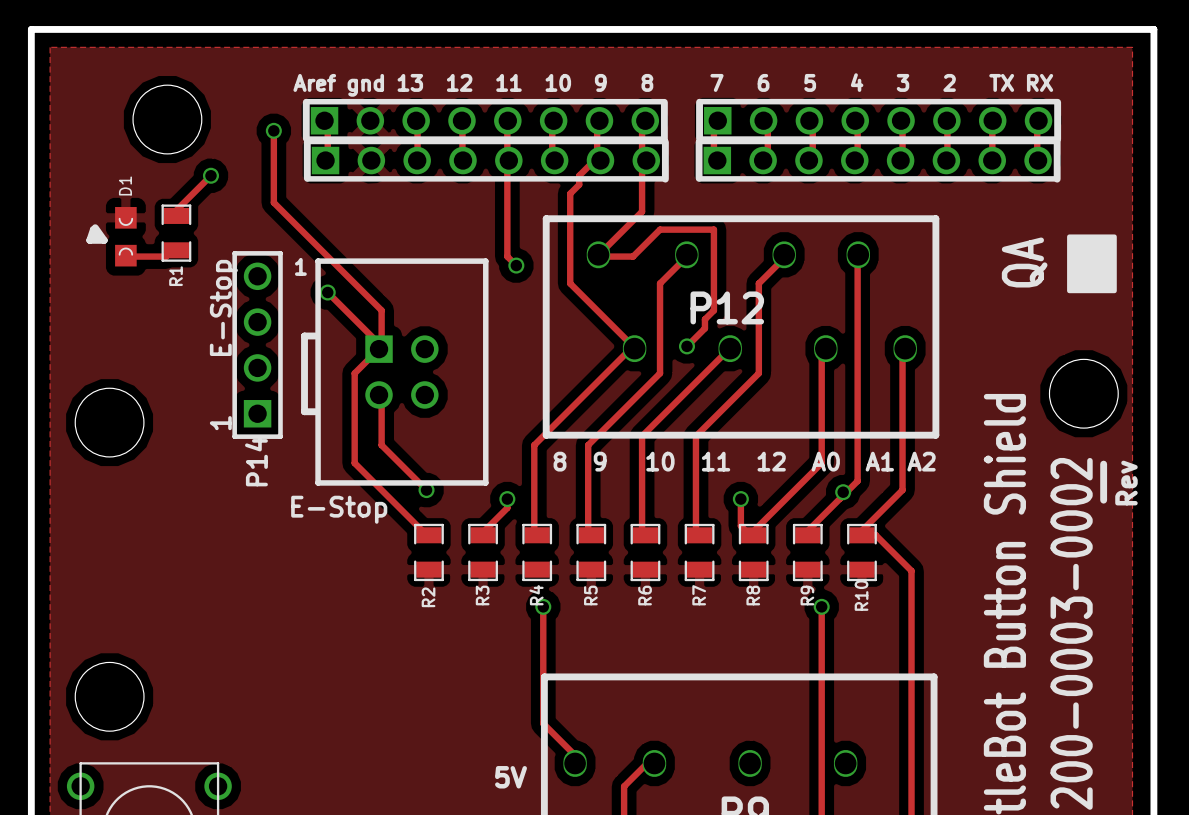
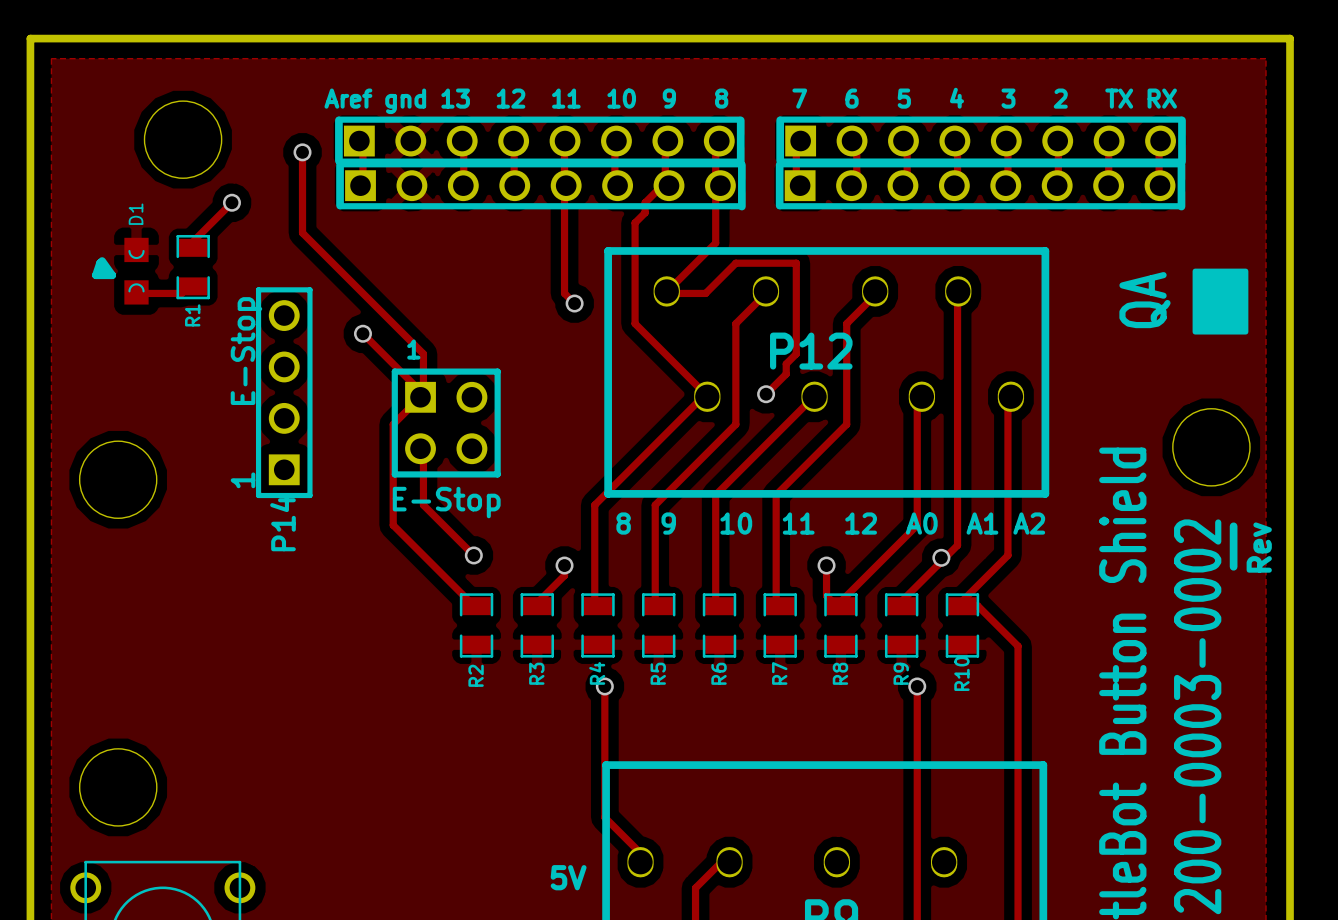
part footprint: [301, 258, 489, 486] -> [391, 368, 501, 478]
part value position: E-Stop (339, 509) -> E-Stop (446, 502)

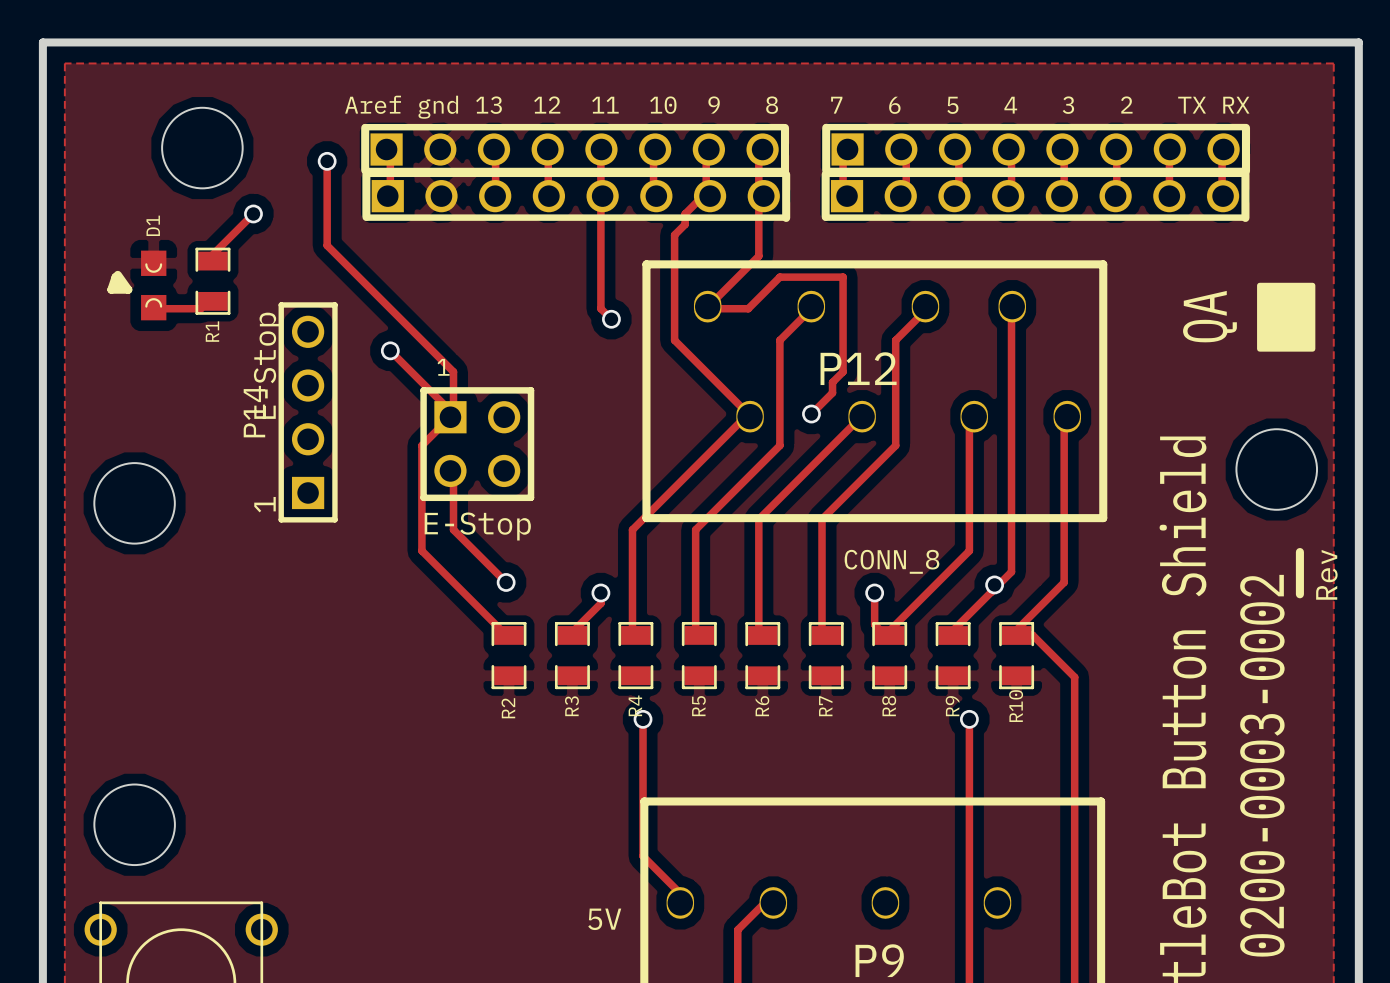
P14 name position: P14 (283, 523) -> P14 (254, 411)
P12 value: 8 9 10 11 12 A0 A1 A2 (830, 523) -> CONN_8 (891, 561)

